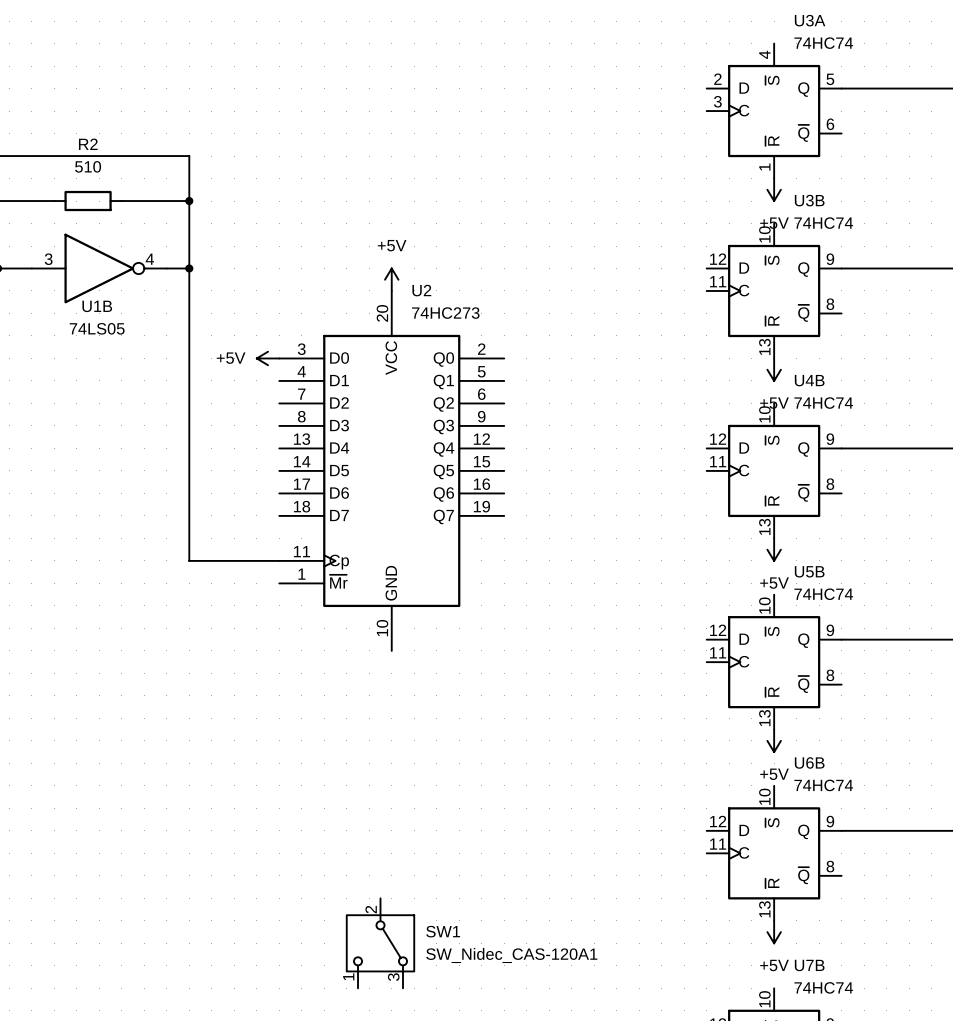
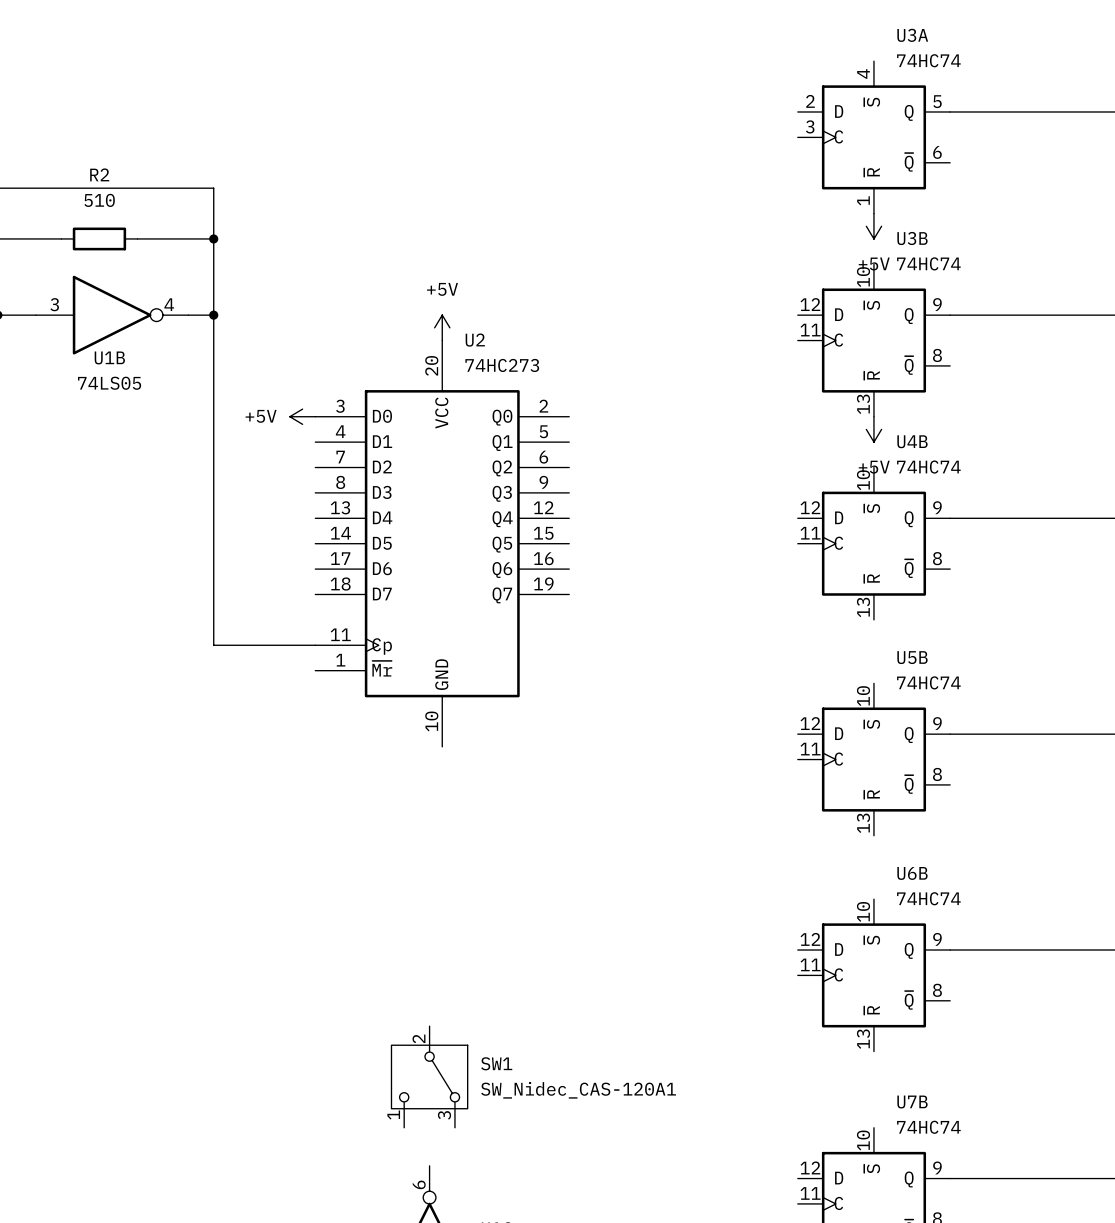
power symbol: +5V (774, 549) -> none
power symbol: +5V (774, 740) -> none
power symbol: +5V (774, 932) -> none

